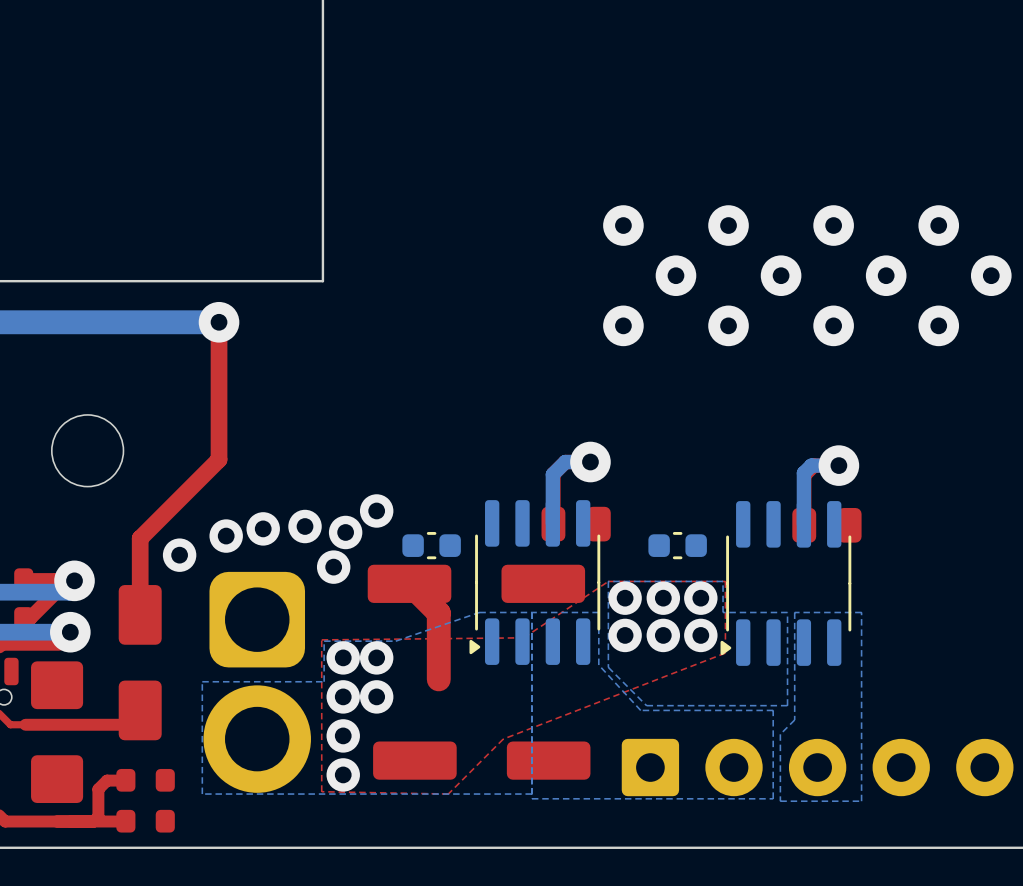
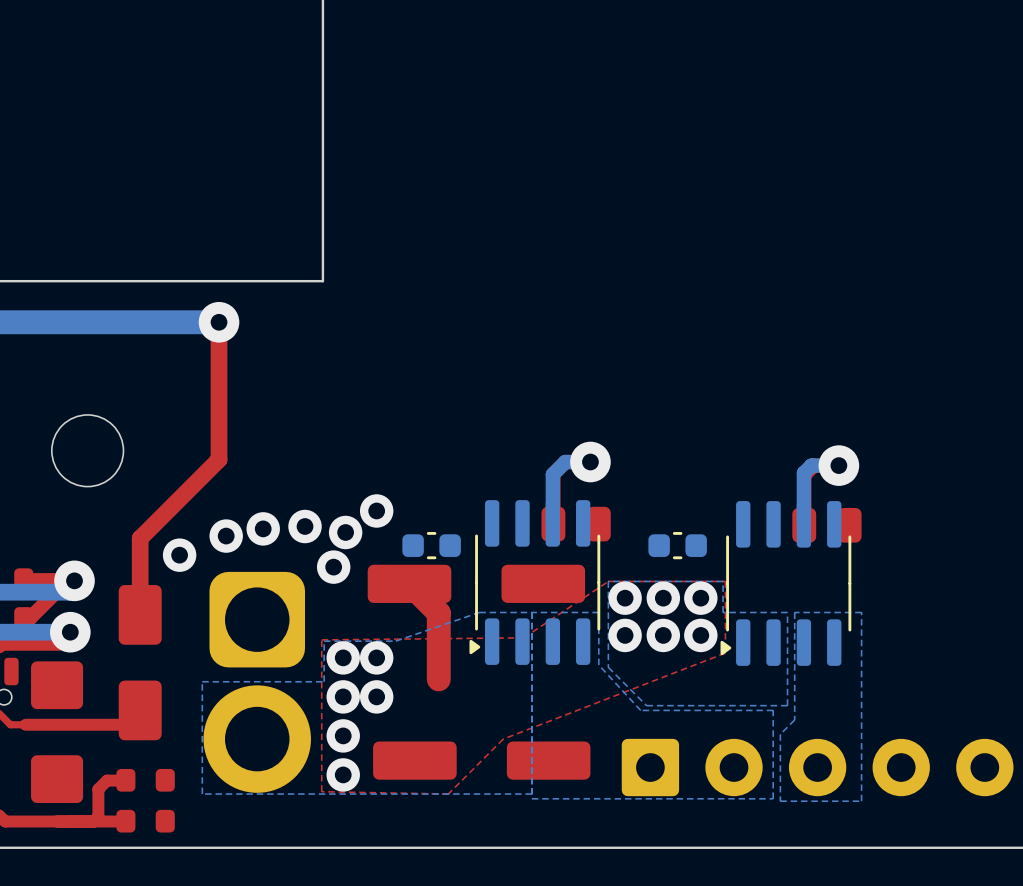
via: (623, 225) -> none
via: (728, 225) -> none
via: (833, 225) -> none
via: (938, 225) -> none
via: (675, 275) -> none
via: (781, 275) -> none
via: (886, 275) -> none
via: (991, 275) -> none
via: (623, 325) -> none
via: (728, 325) -> none
via: (833, 325) -> none
via: (938, 325) -> none

